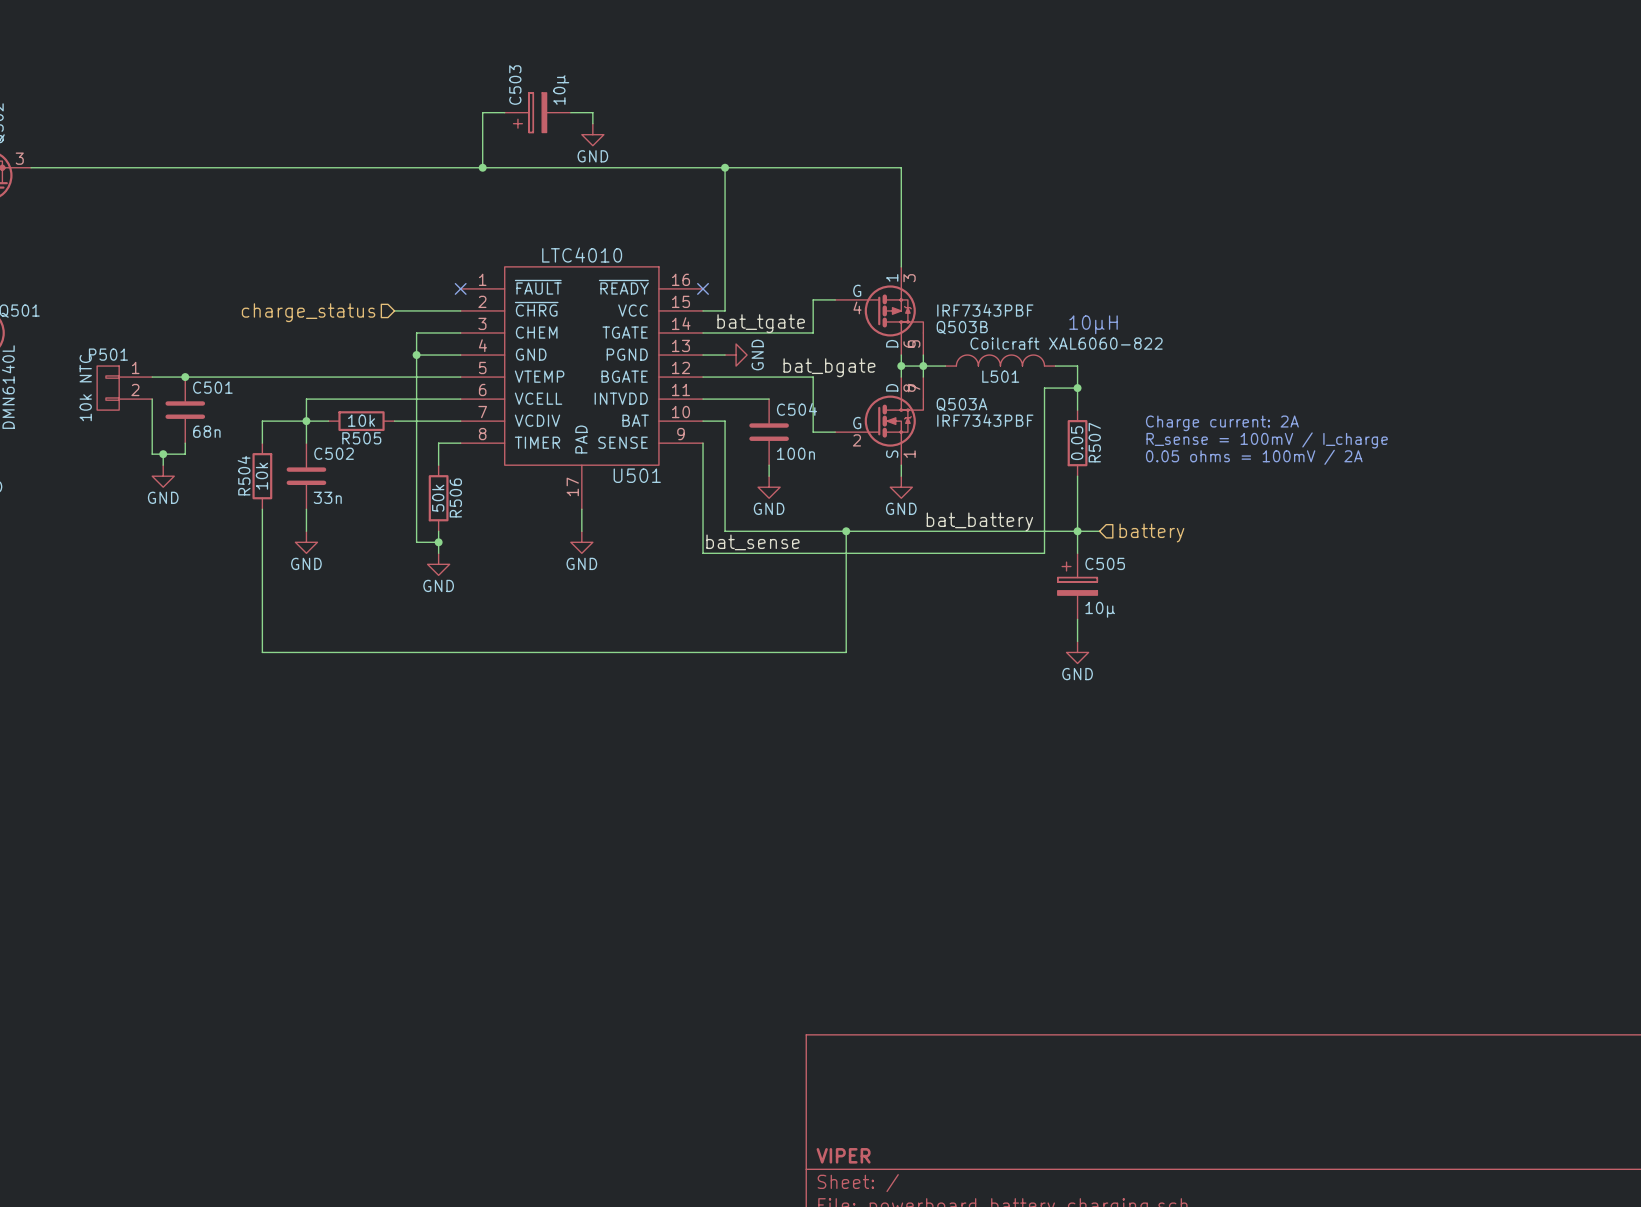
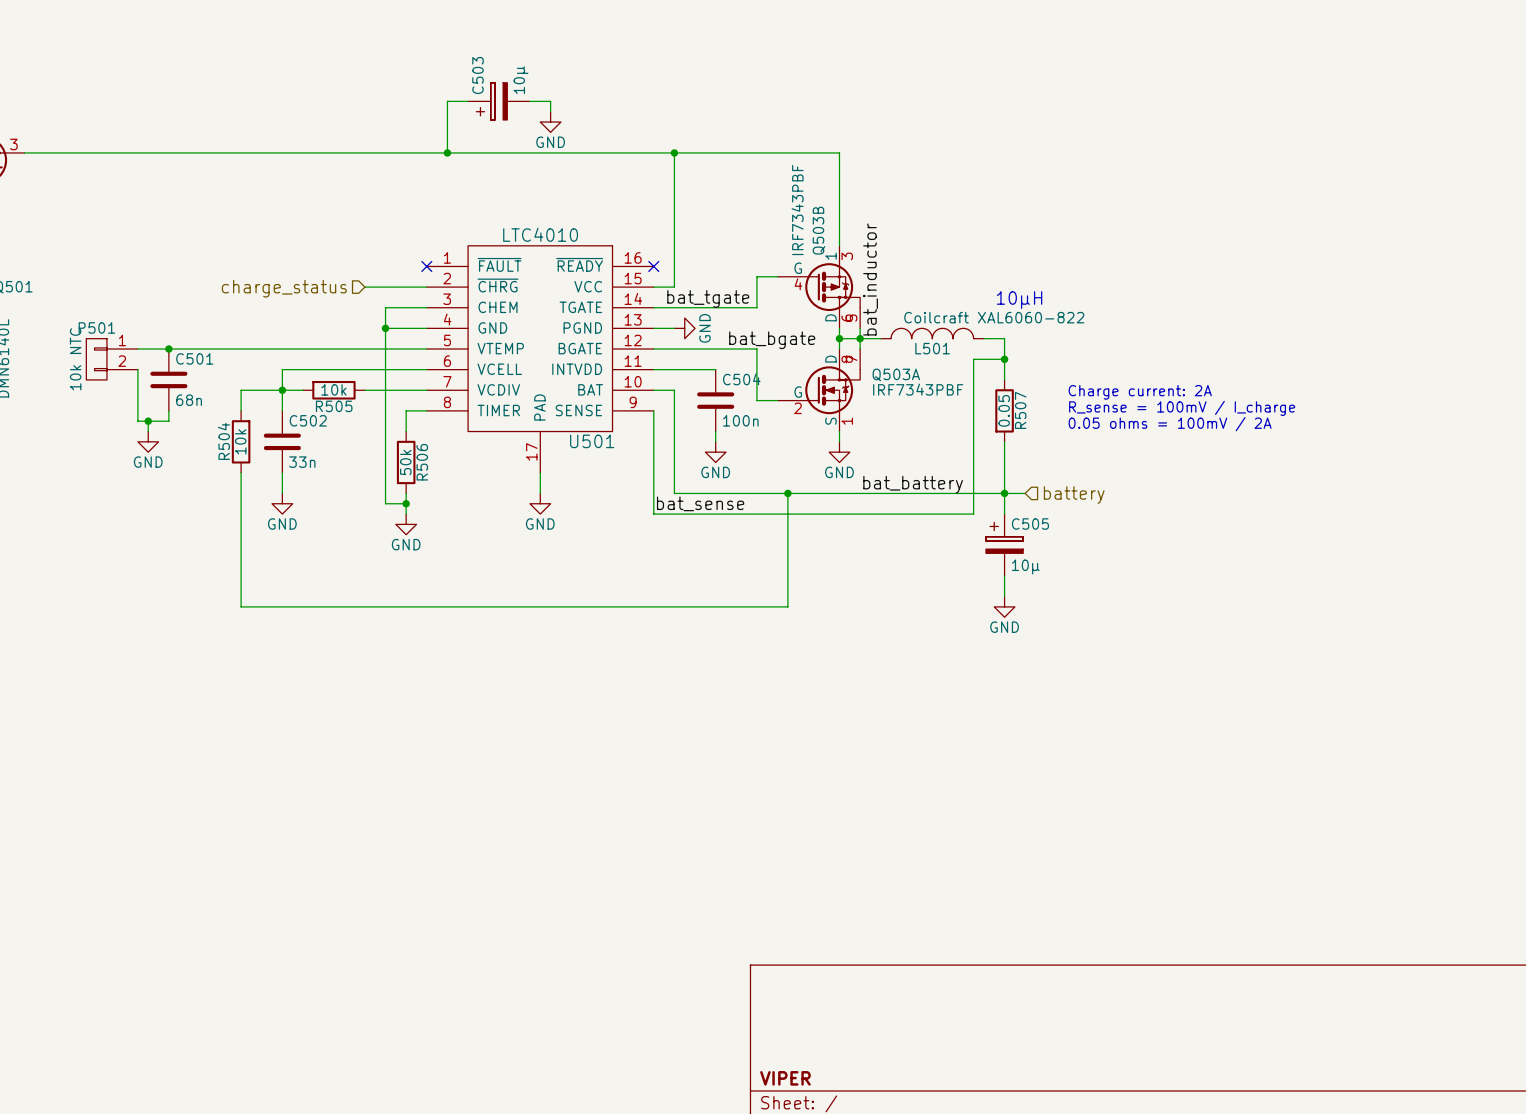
label: none -> bat_inductor (870, 279)
Q503B value rotation: 0° (985, 310) -> 90° counterclockwise (797, 210)
Q503B value position: IRF7343PBF (985, 310) -> IRF7343PBF (797, 210)
Q503B name rotation: 0° (962, 327) -> 90° counterclockwise (818, 230)
Q503B name position: Q503B (962, 327) -> Q503B (818, 230)

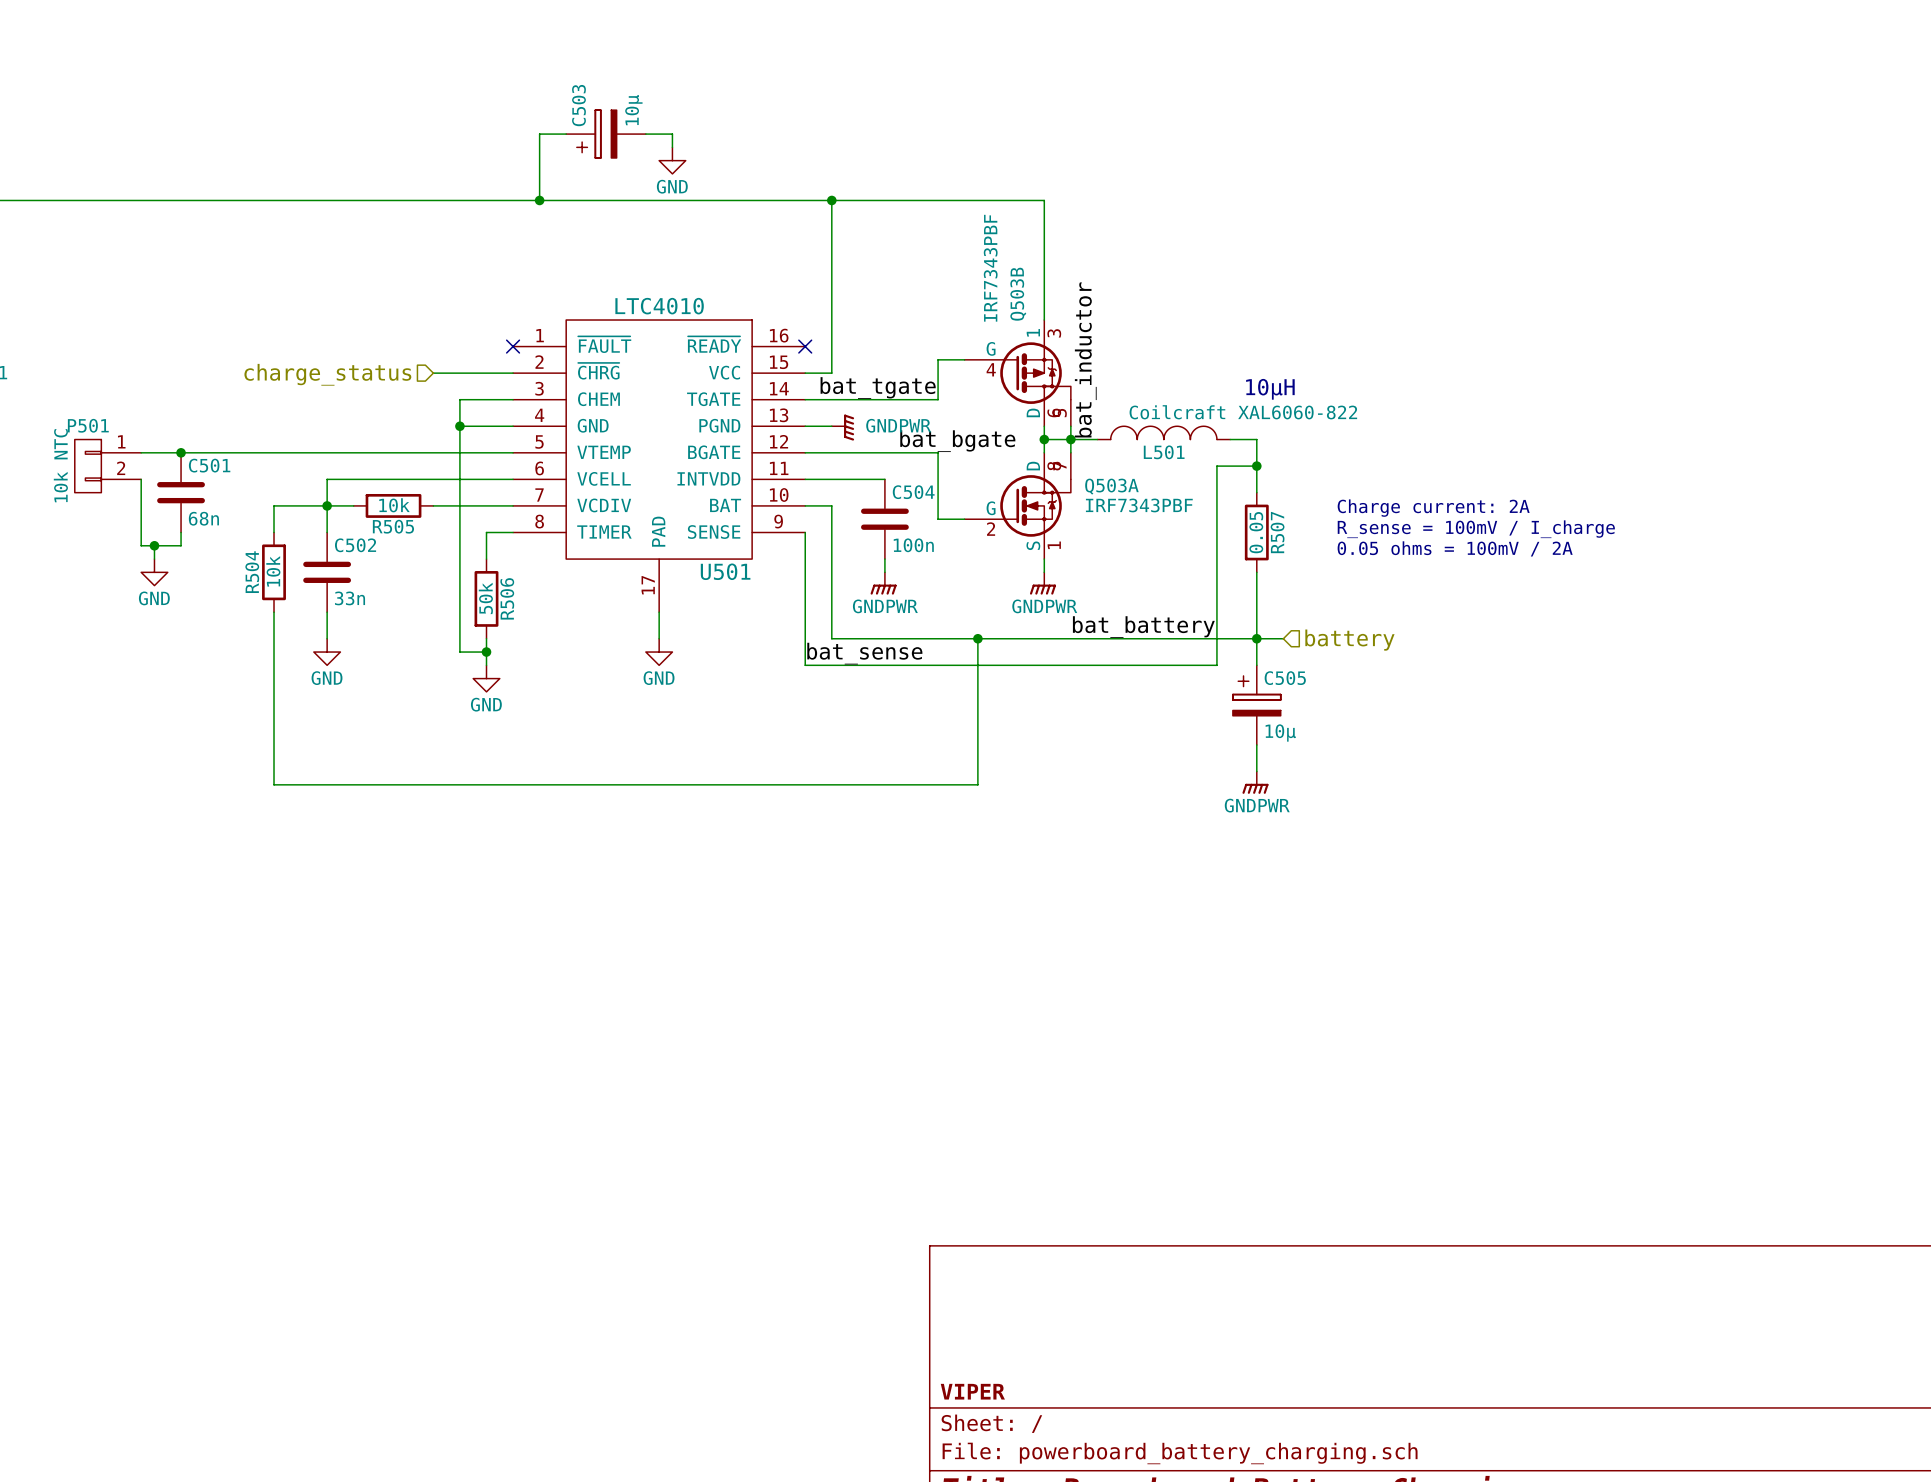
power symbol: GND (684, 328) -> GNDPWR (842, 427)
power symbol: GND (715, 452) -> GNDPWR (883, 583)
power symbol: GND (839, 452) -> GNDPWR (1042, 583)
power symbol: GND (1004, 606) -> GNDPWR (1255, 782)

